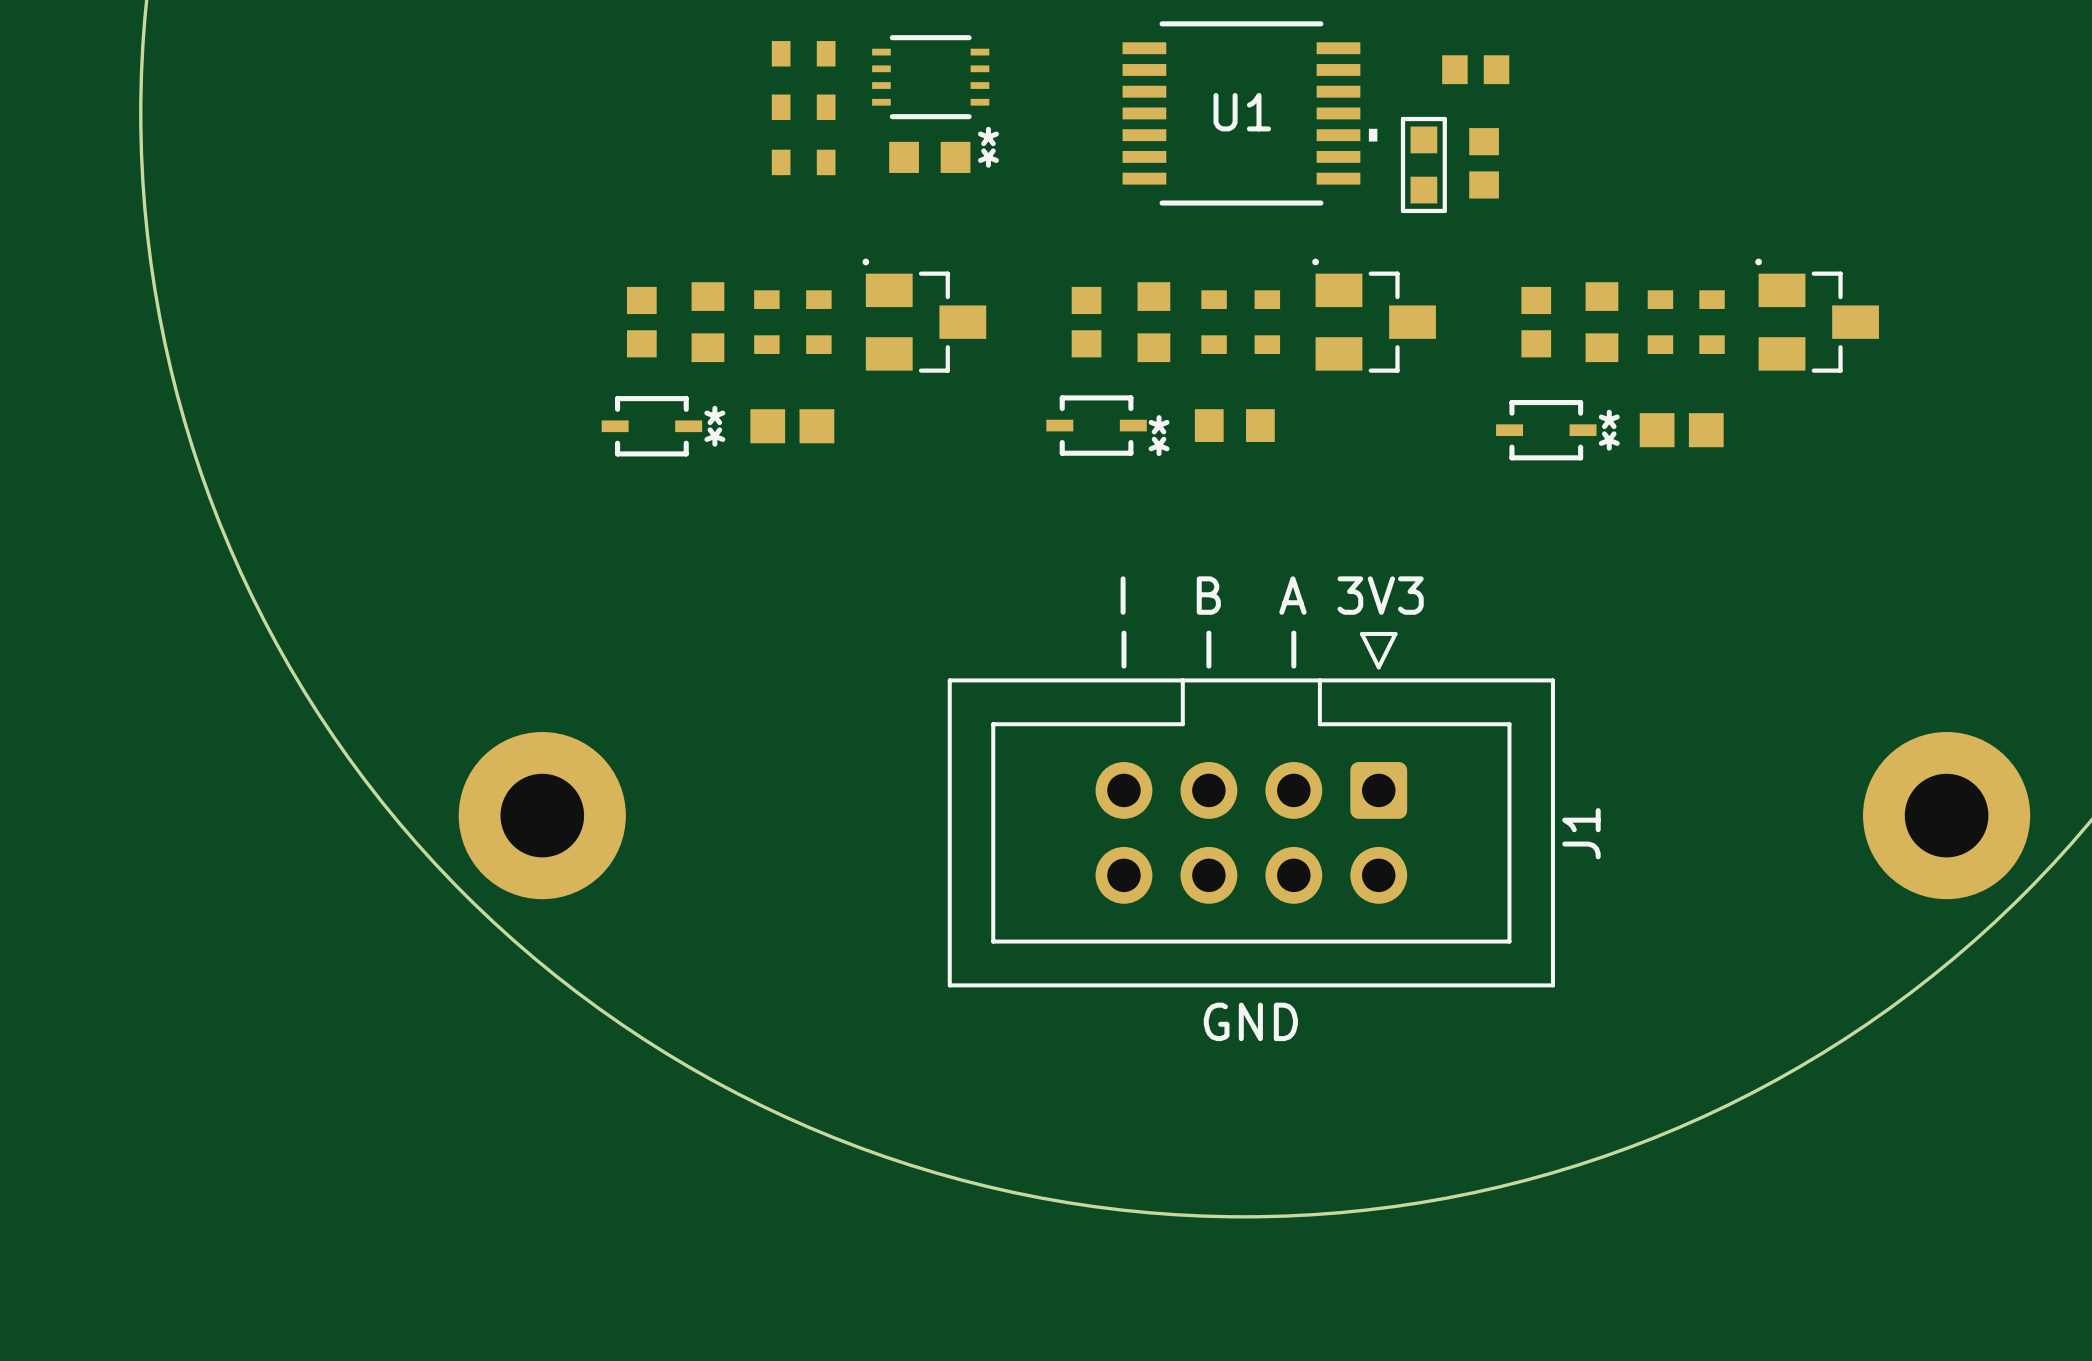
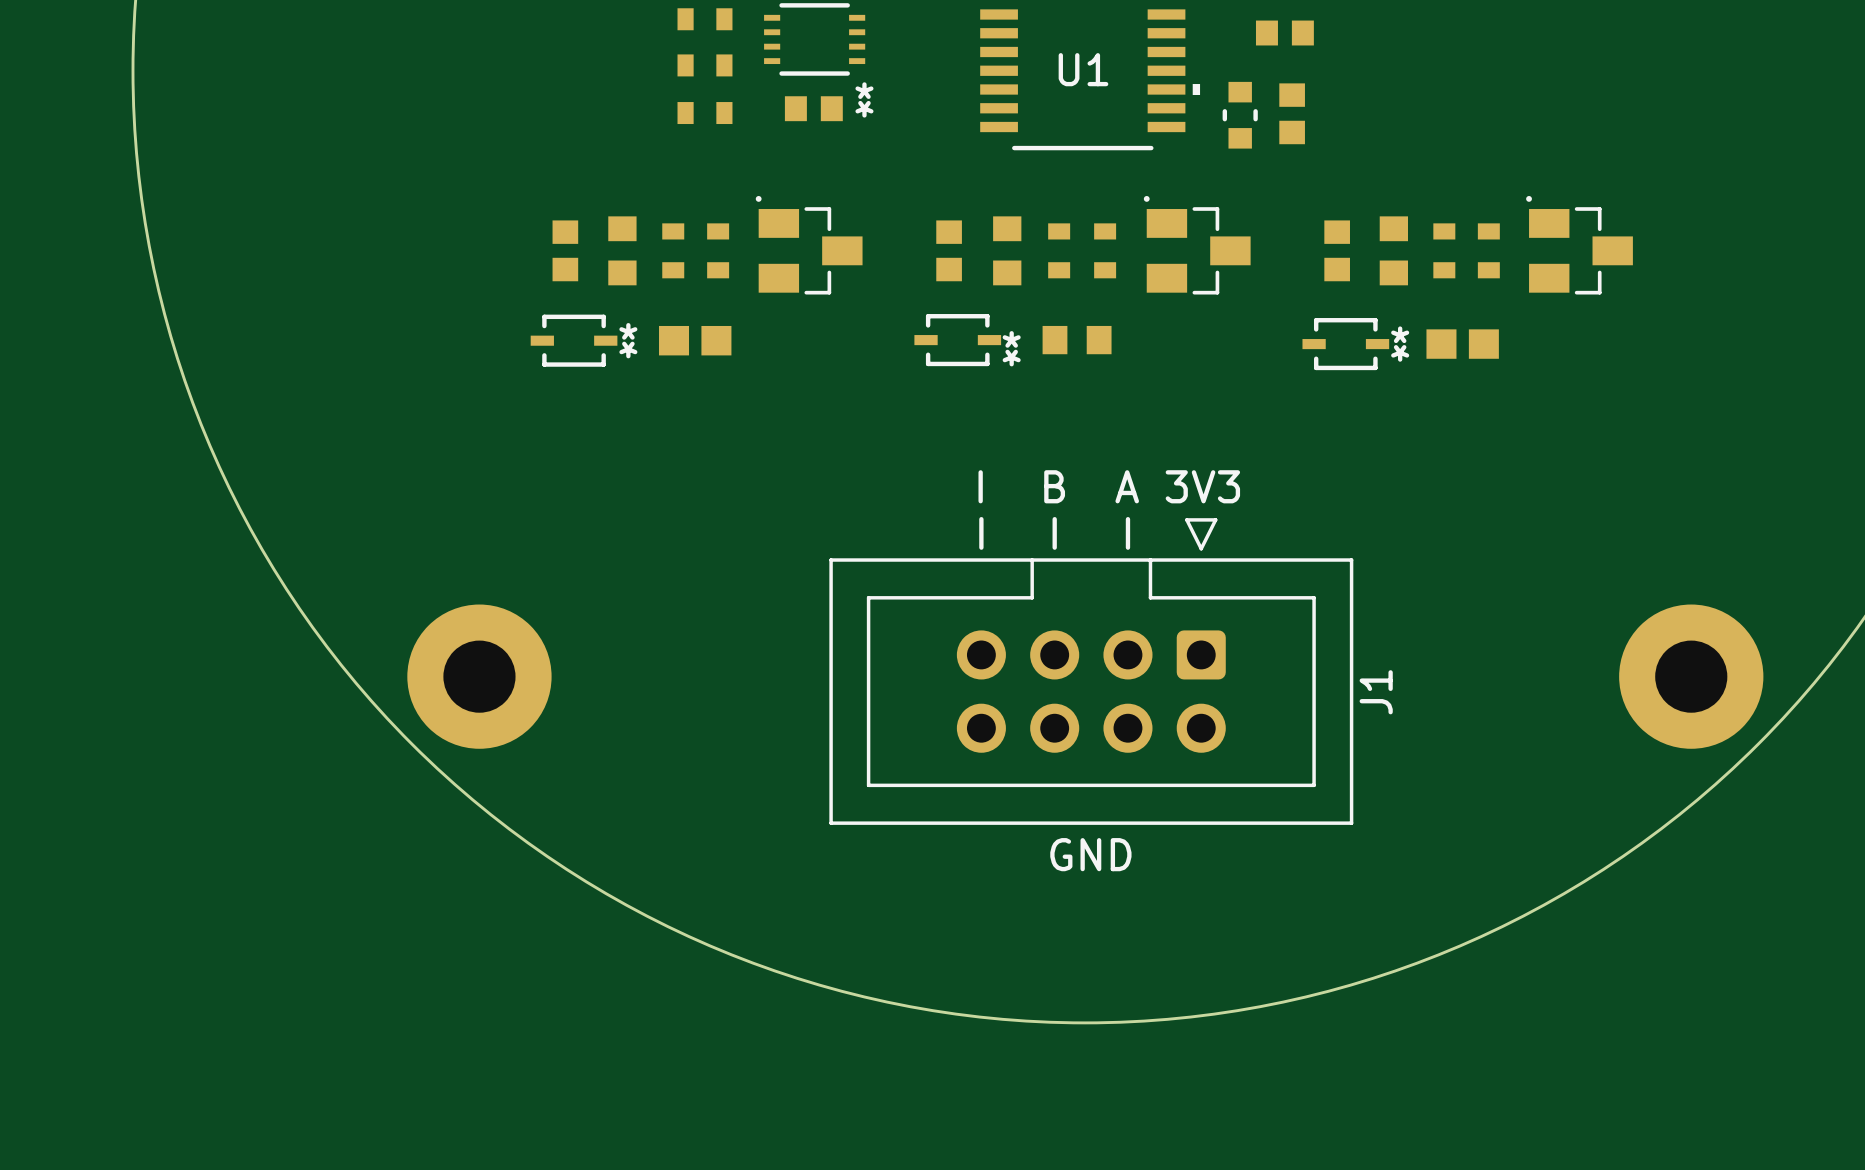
part footprint: [1400, 116, 1447, 214] -> [1222, 81, 1258, 149]
part footprint: [889, 141, 971, 173] -> [784, 96, 843, 122]

